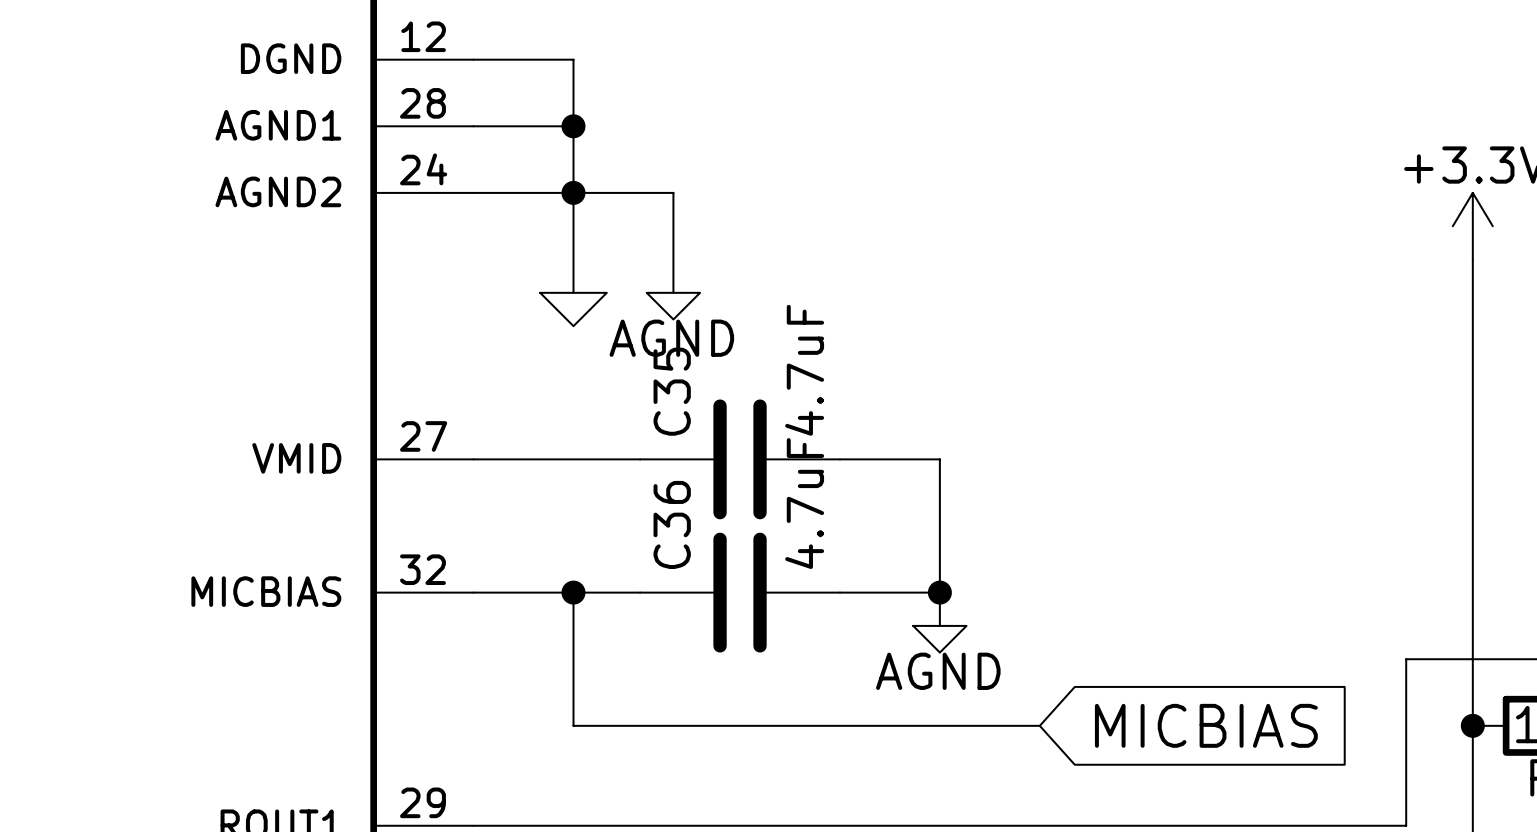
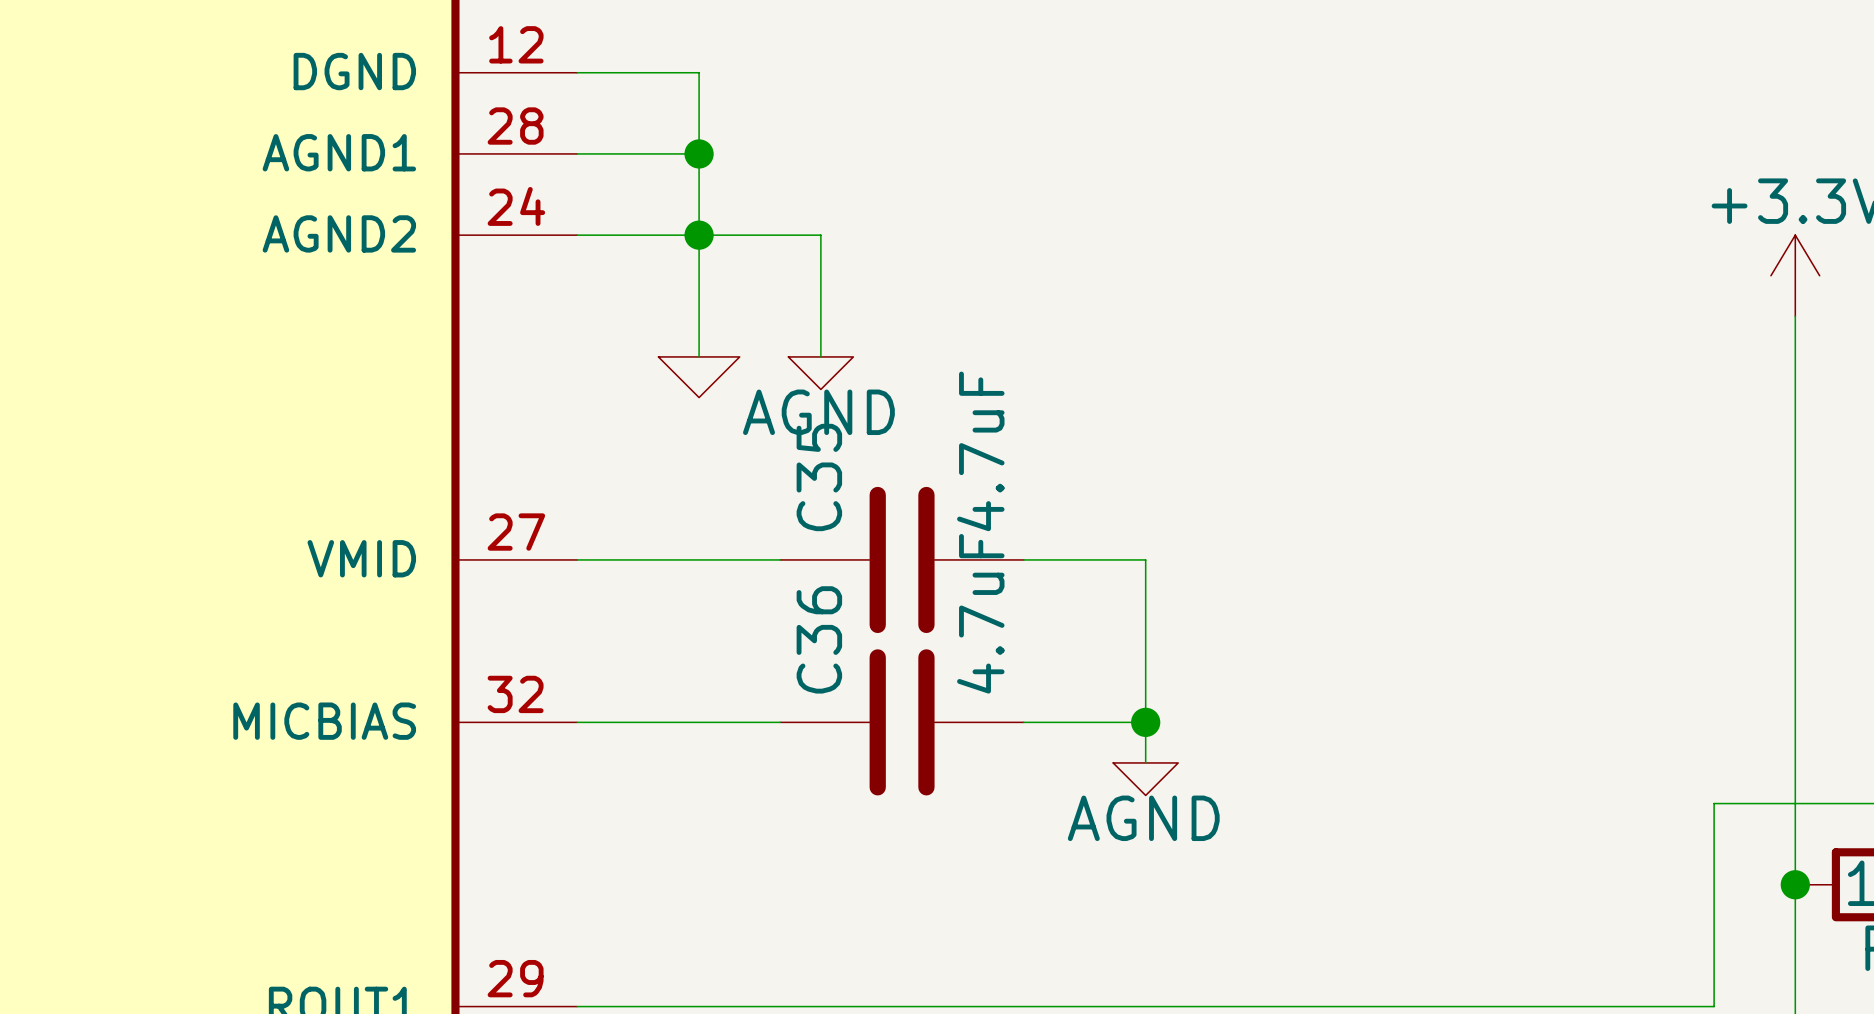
wire: (573, 592) (573, 725) (1039, 725) -> none
junction: (573, 592) -> none
global label: MICBIAS (1206, 725) -> none

